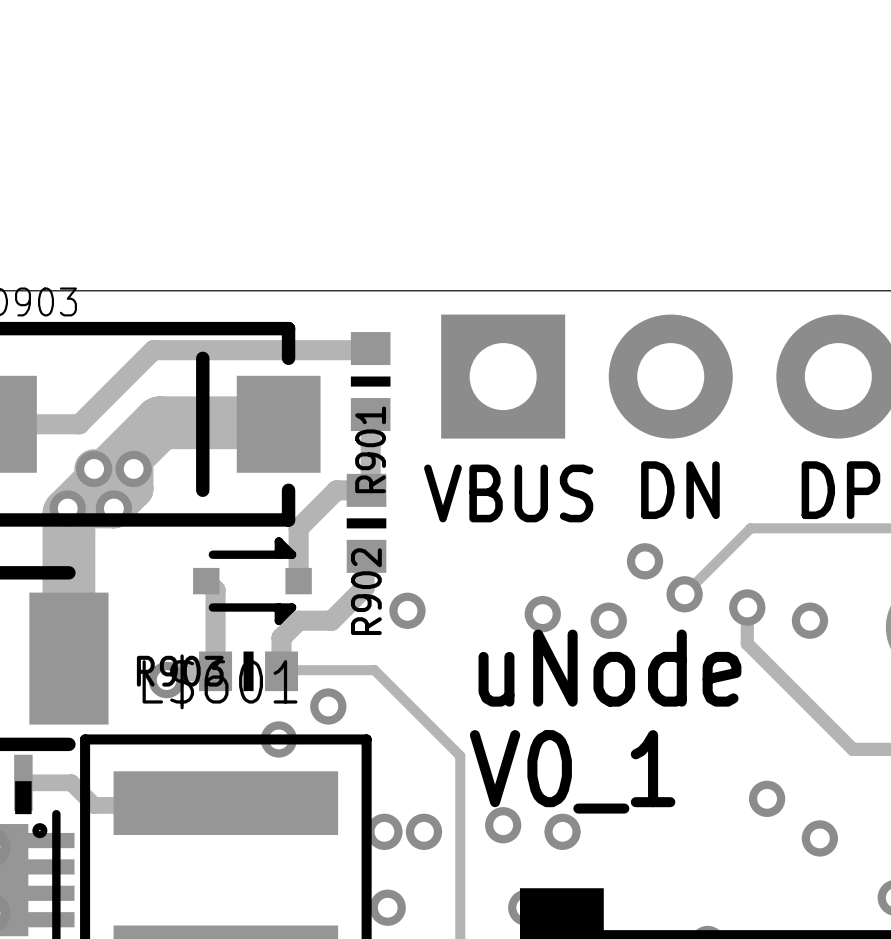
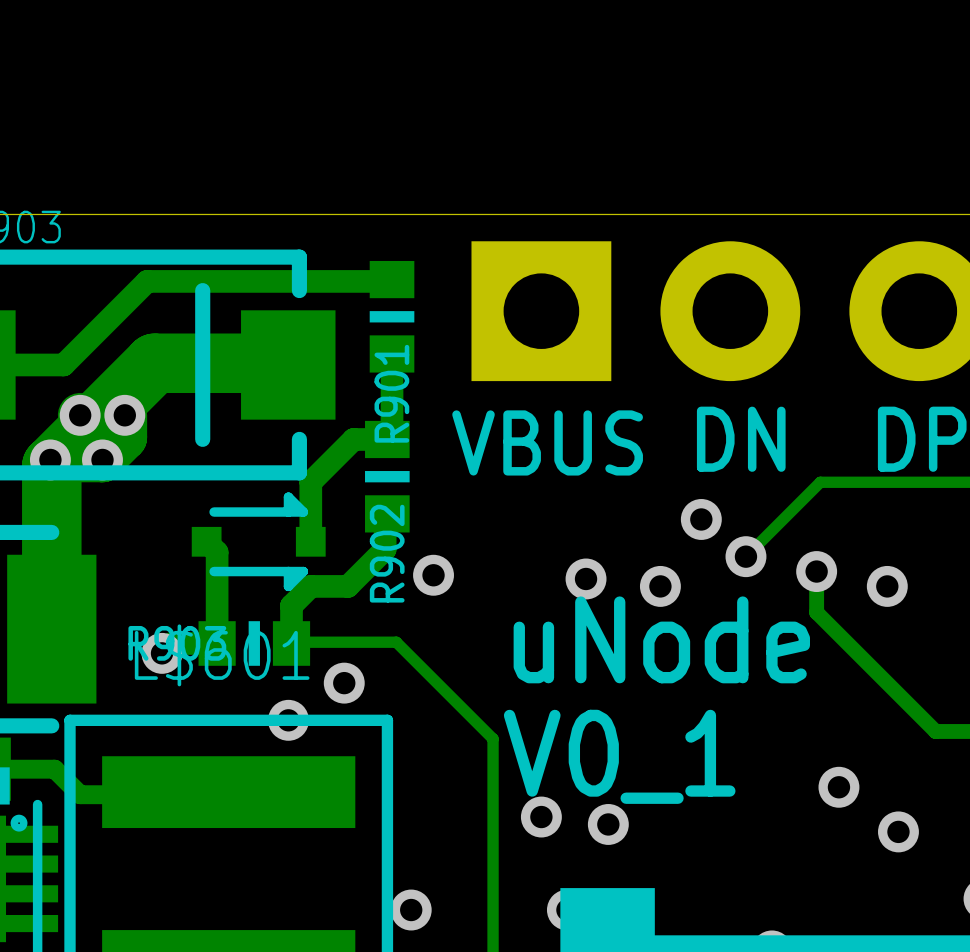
via: (384, 831) -> none
via: (424, 831) -> none

